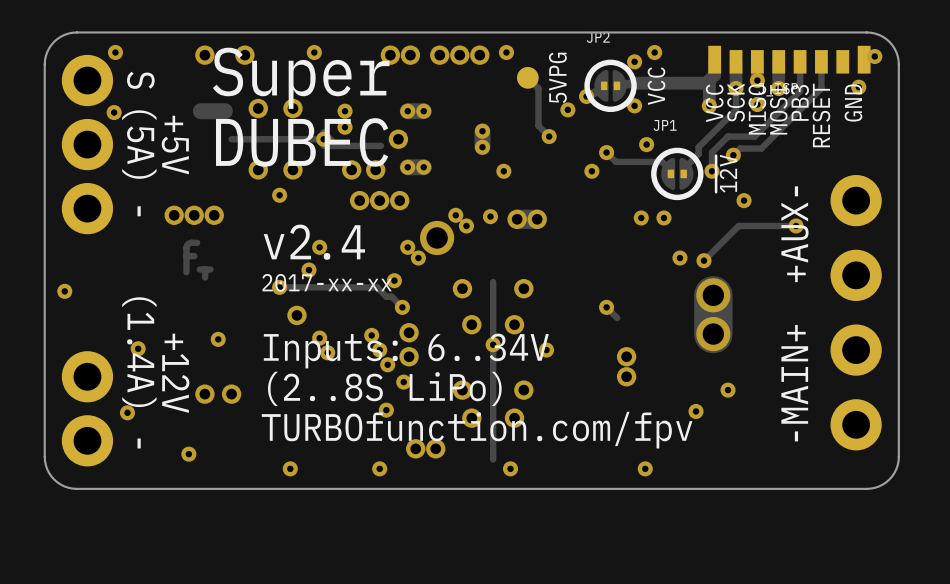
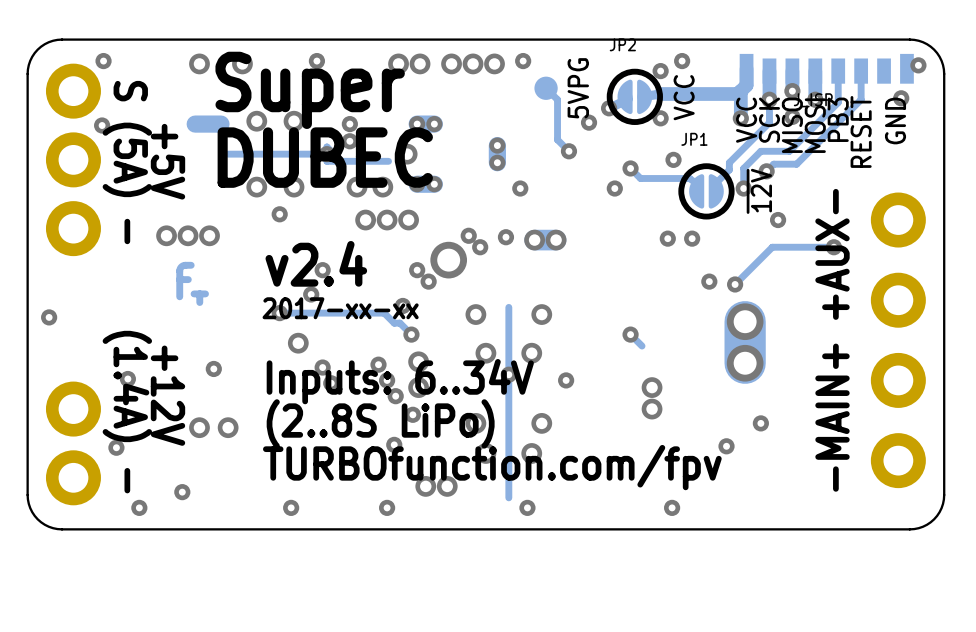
via: none -> (139, 507)

